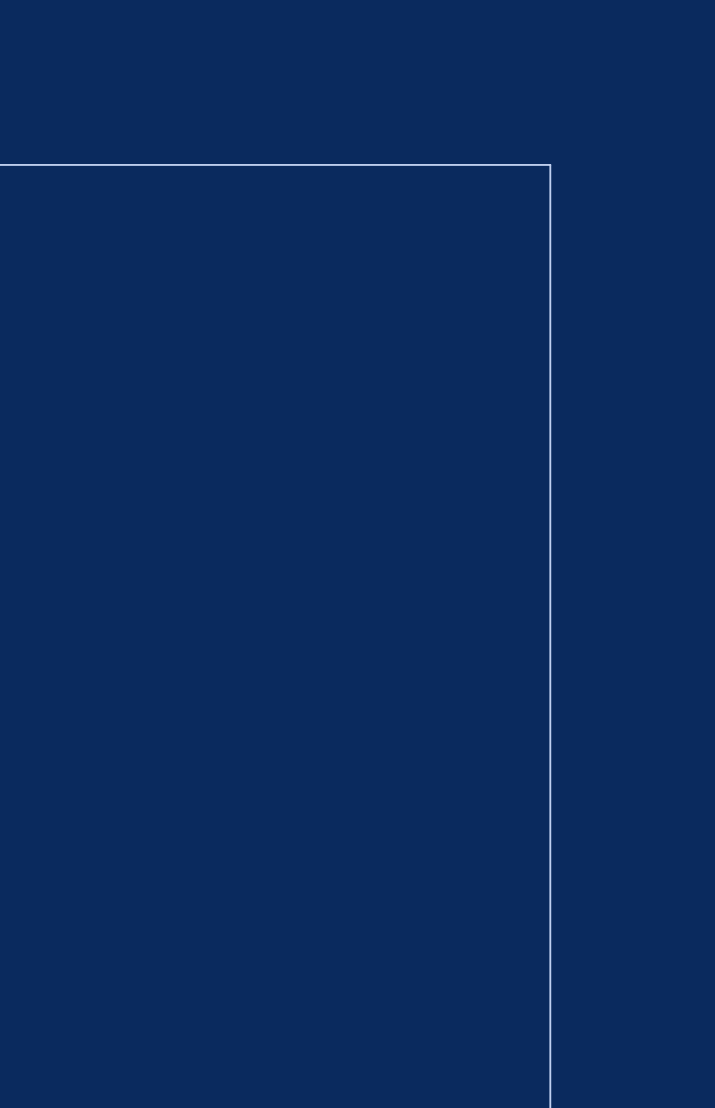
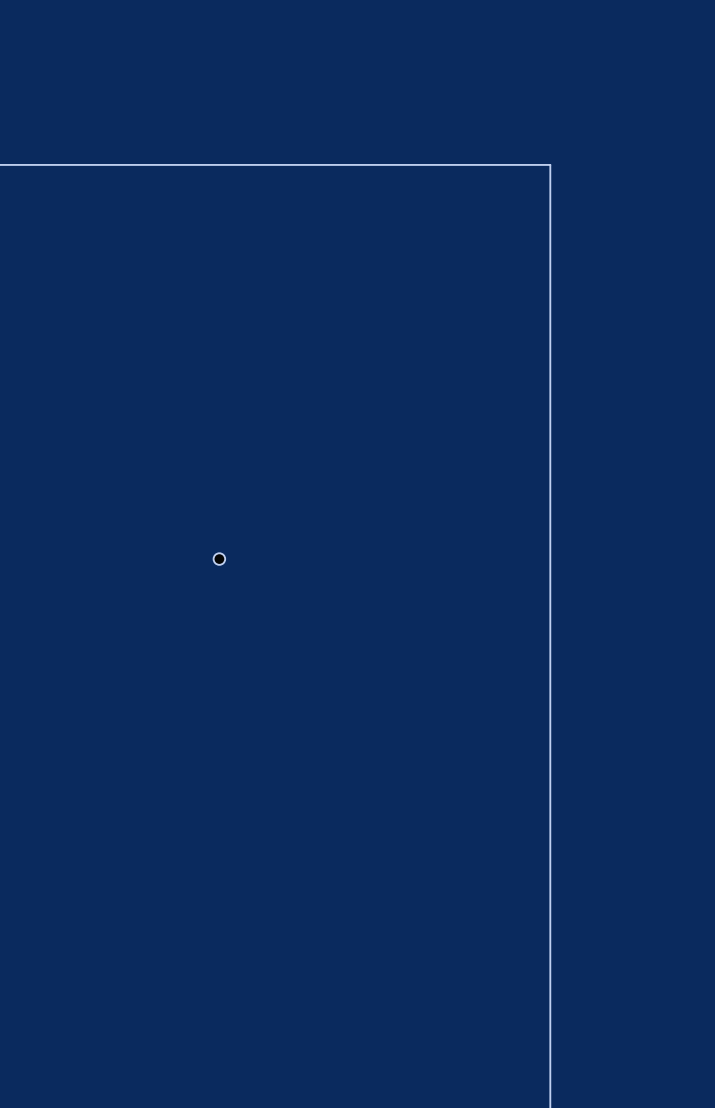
hole: none -> (219, 559)

